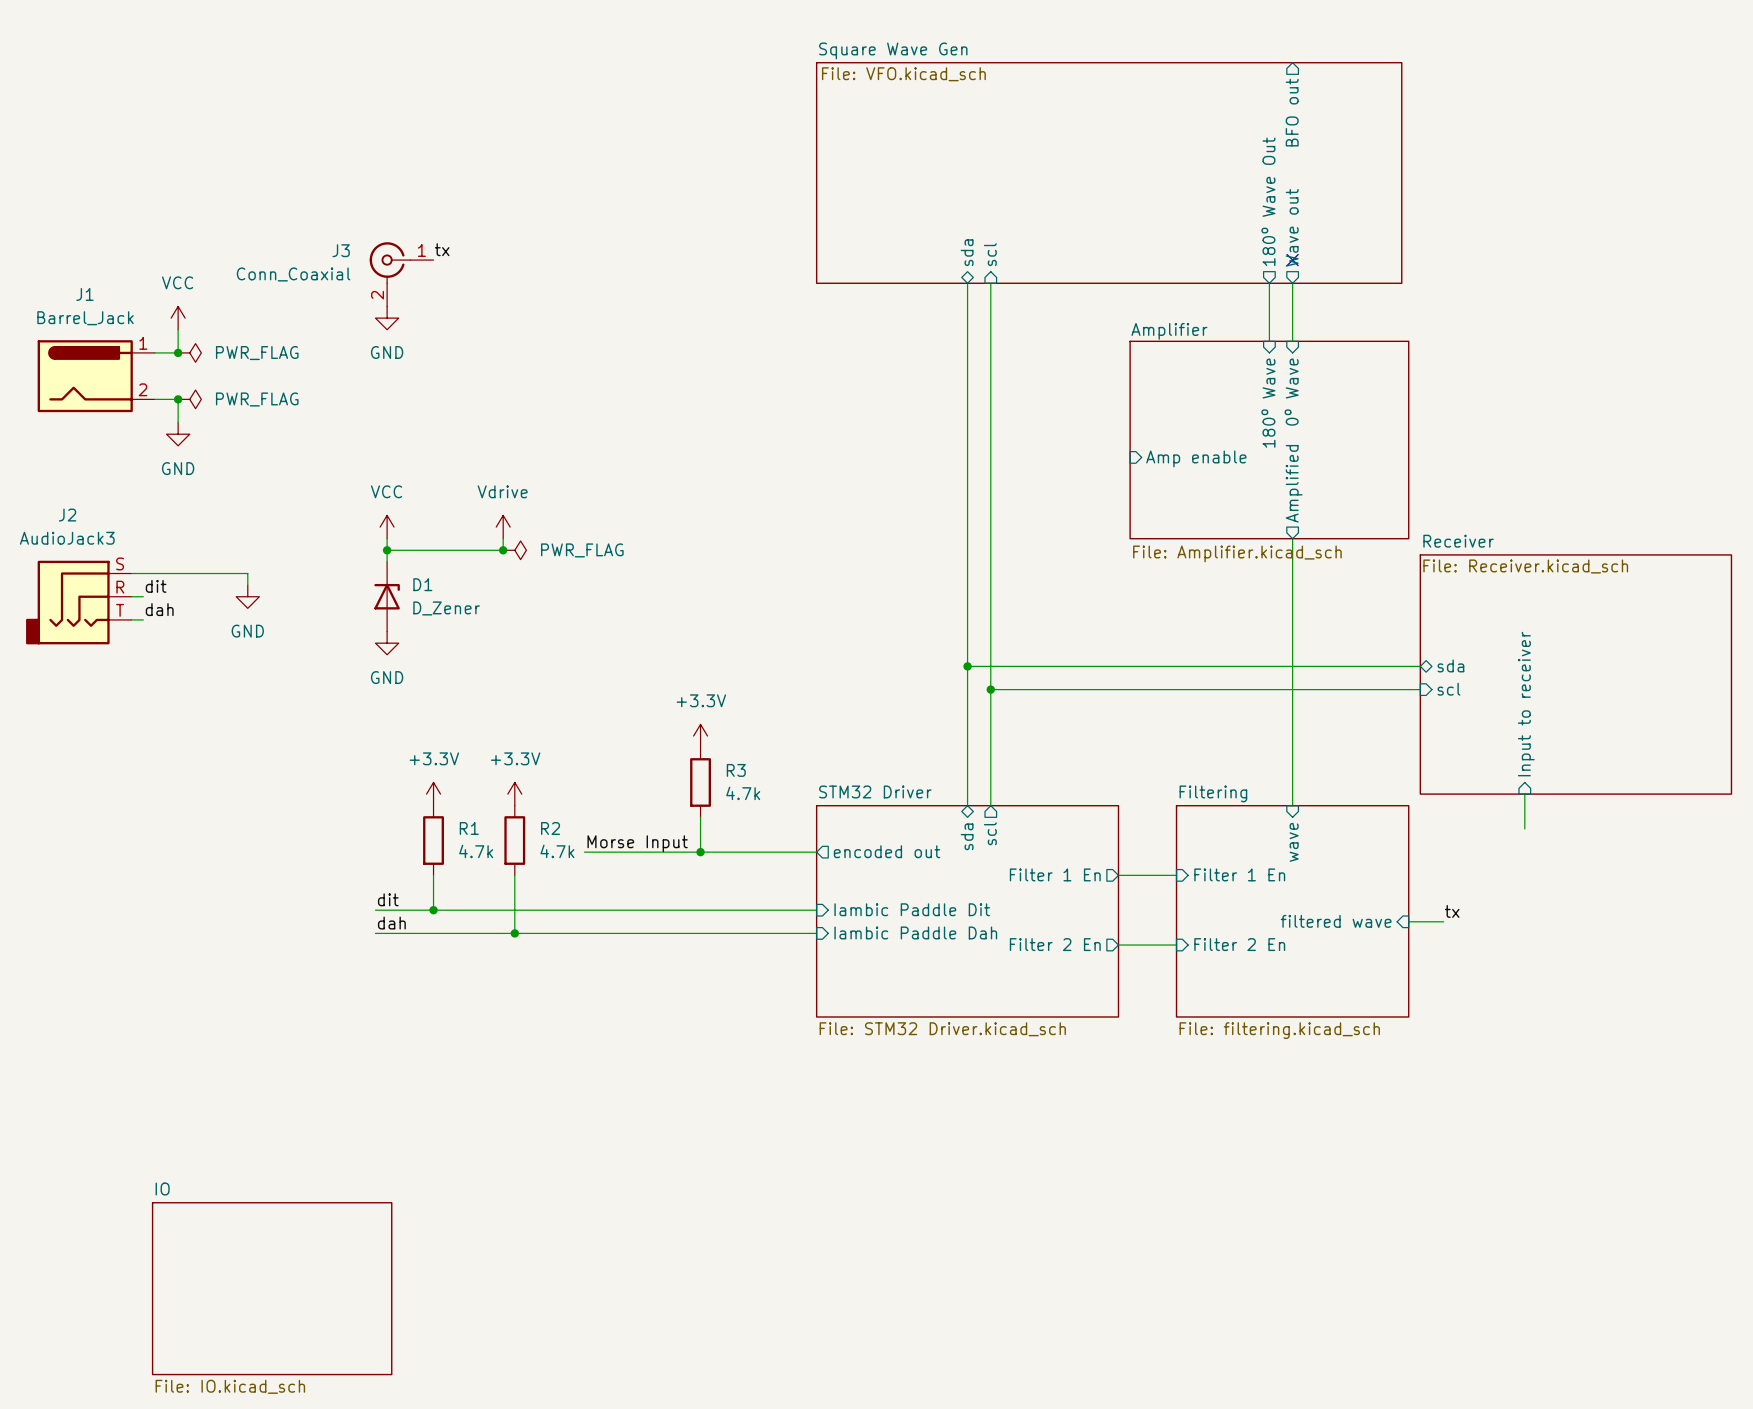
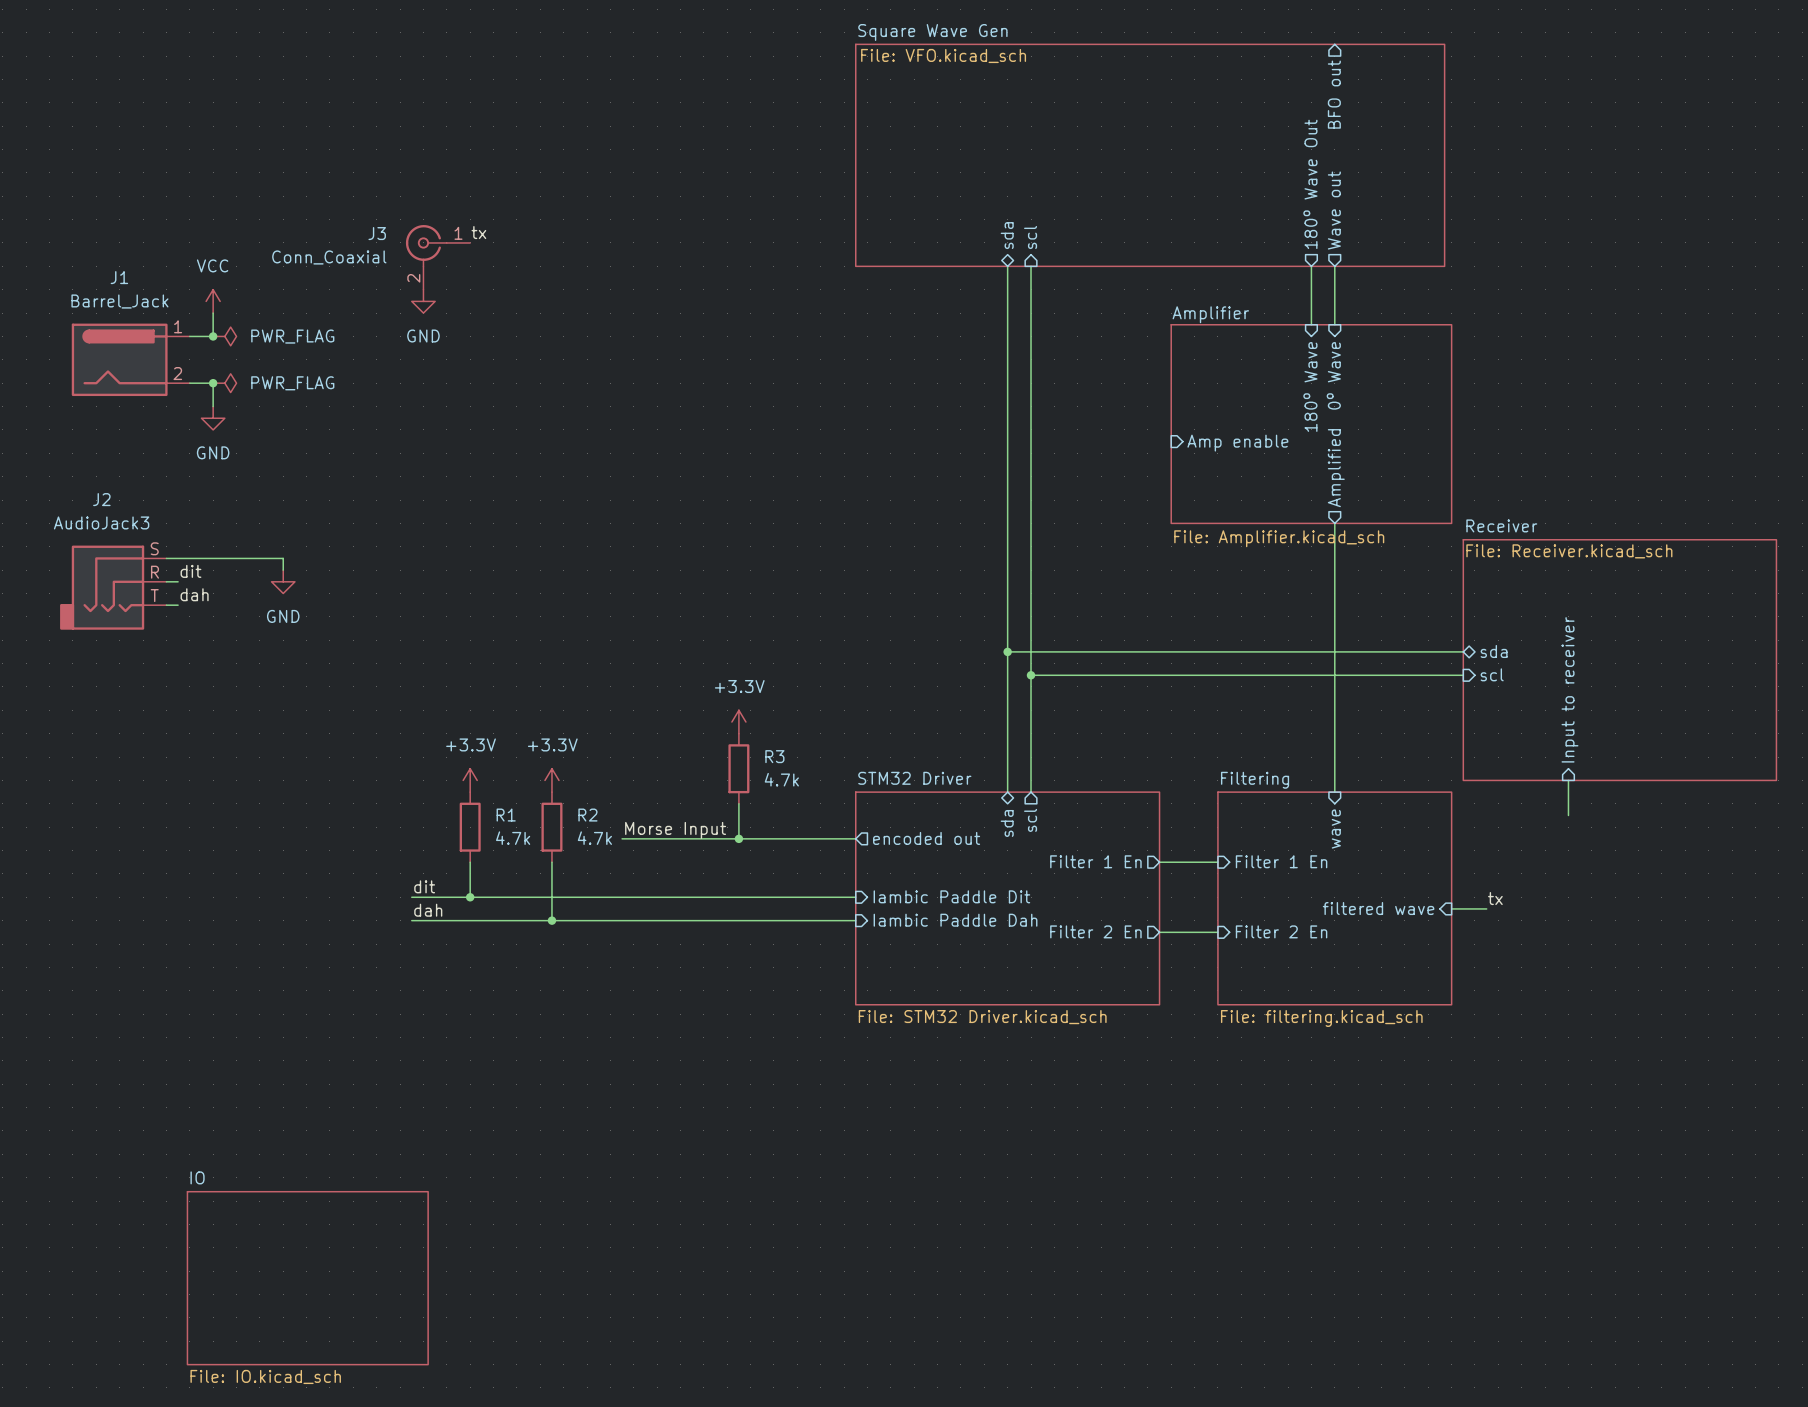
no-connect mark: (1292, 260) -> none
power symbol: VCC (387, 527) -> none
power symbol: Vdrive (503, 527) -> none
wire: (387, 538) (387, 561) -> none
wire: (503, 538) (503, 550) (387, 550) -> none
junction: (387, 550) -> none
junction: (503, 550) -> none
power symbol: PWR_FLAG (514, 550) -> none
D1: D_Zener (387, 596) -> none
power symbol: GND (387, 643) -> none

